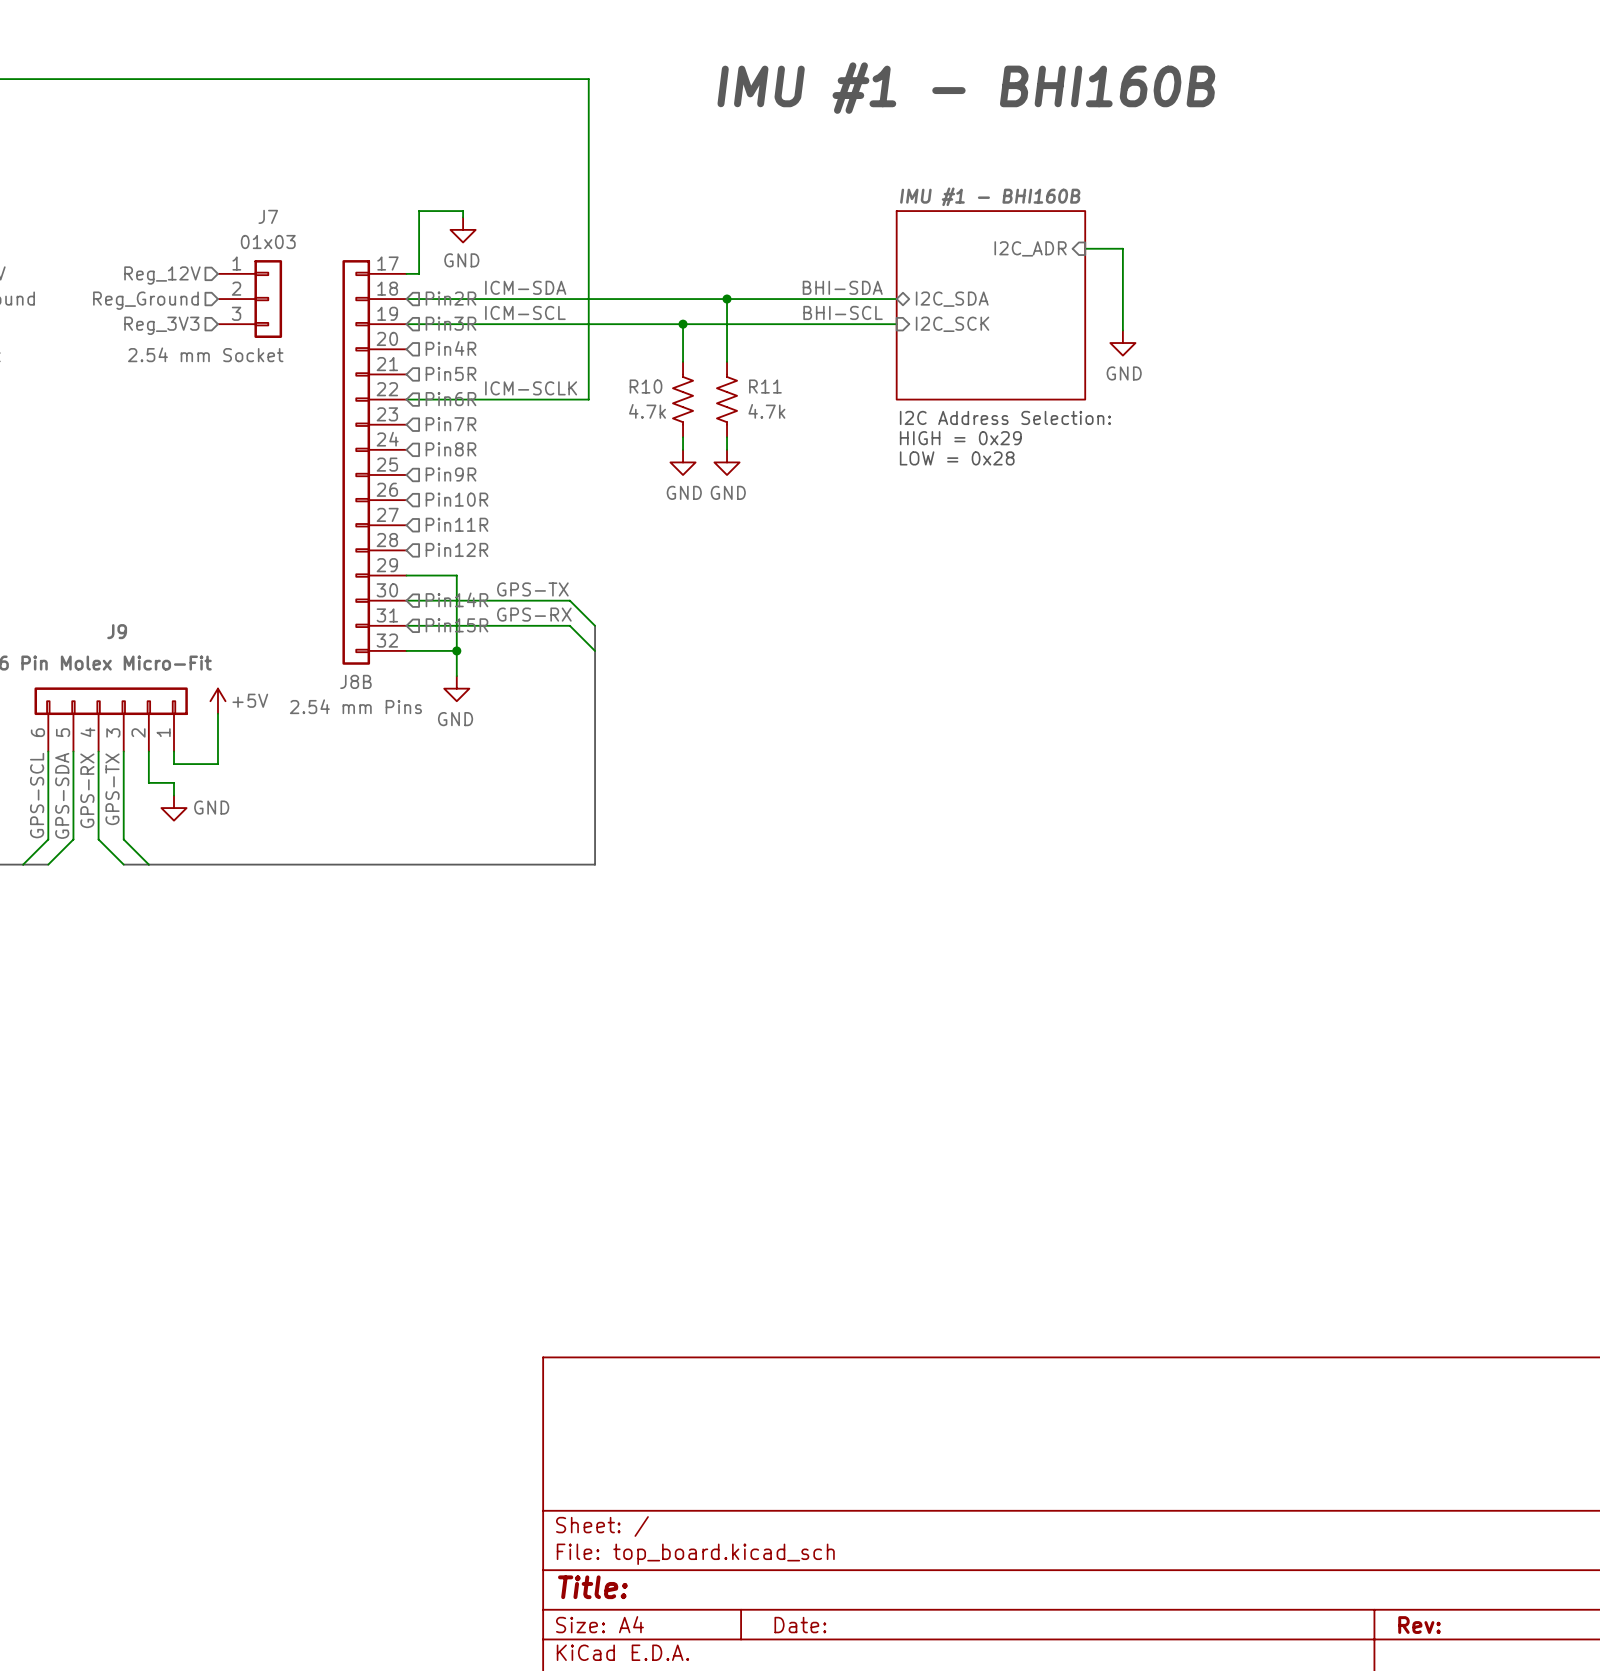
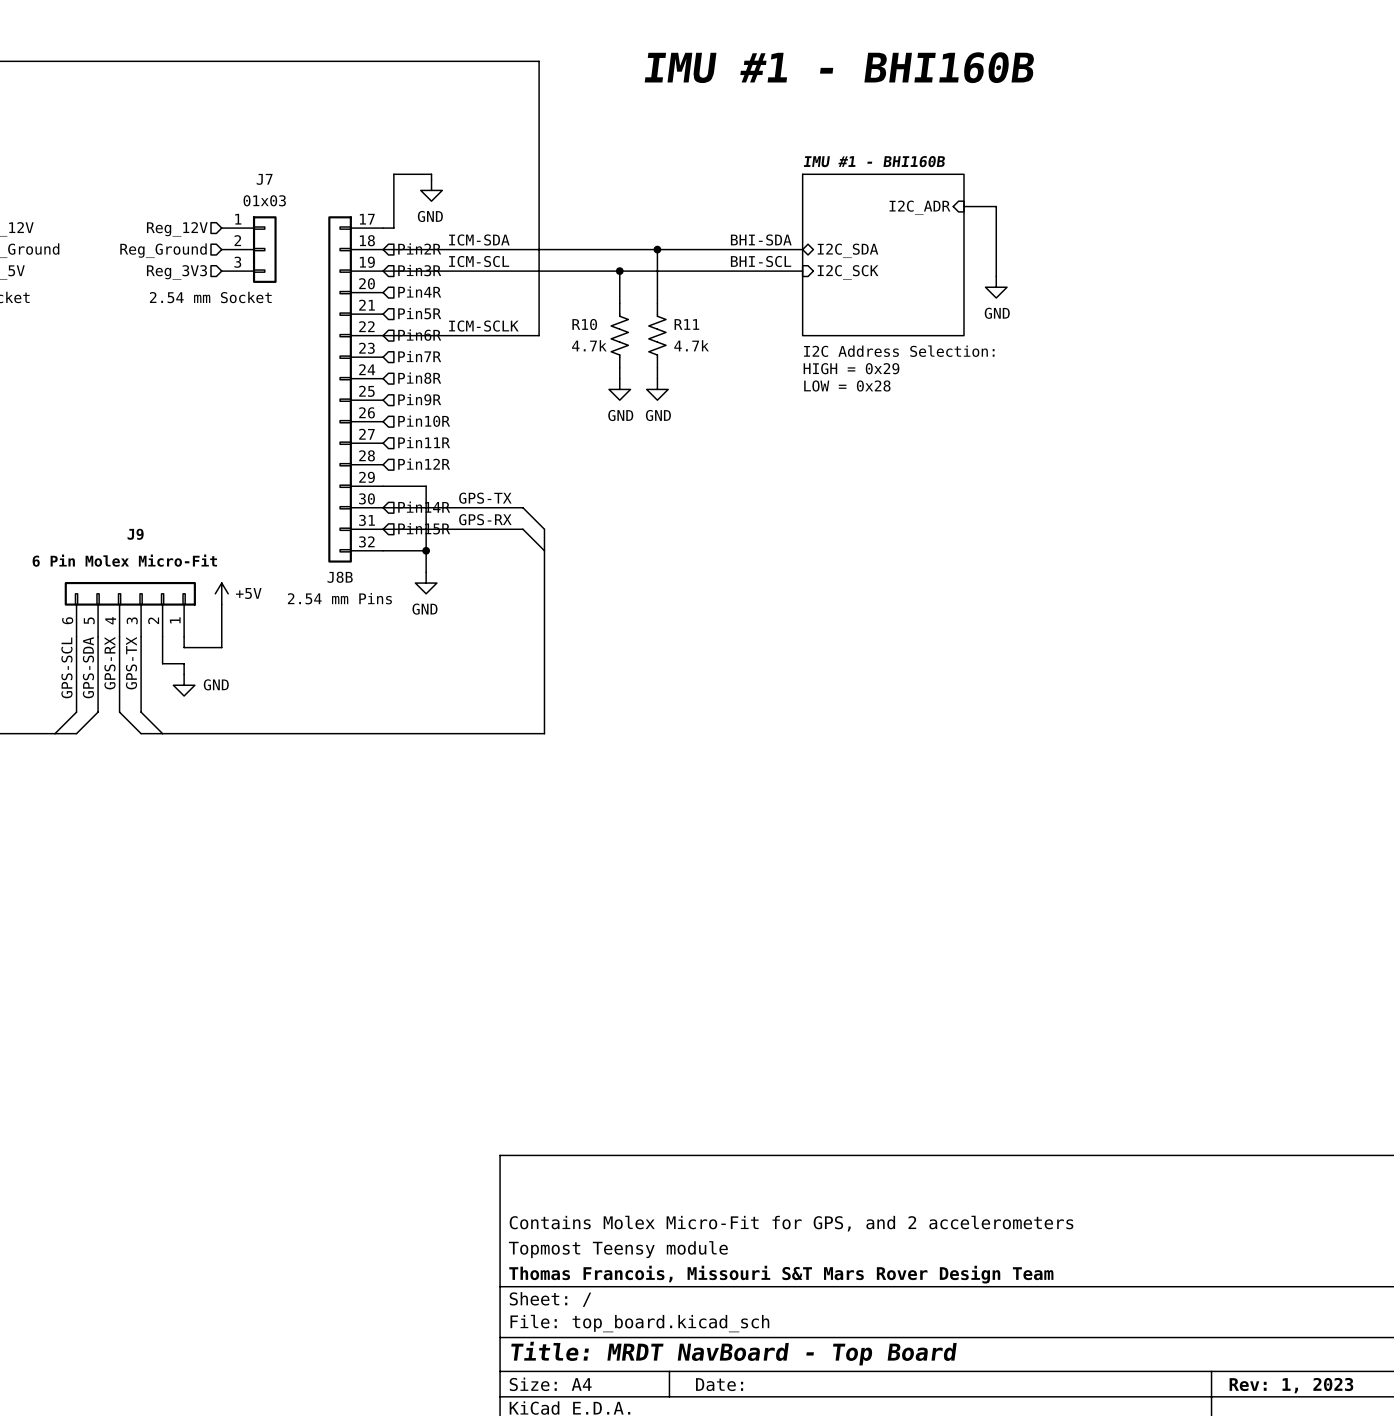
title block: none -> Contains Molex Micro-Fit for GPS, and 2 accelerometers (791, 1223)
title block: none -> Topmost Teensy module (618, 1249)
title block: none -> Thomas Francois, Missouri S&T Mars Rover Design Team (781, 1274)
title block: Title: (592, 1587) -> Title: MRDT NavBoard - Top Board (733, 1353)
title block: Rev: (1419, 1625) -> Rev: 1, 2023 (1291, 1385)

